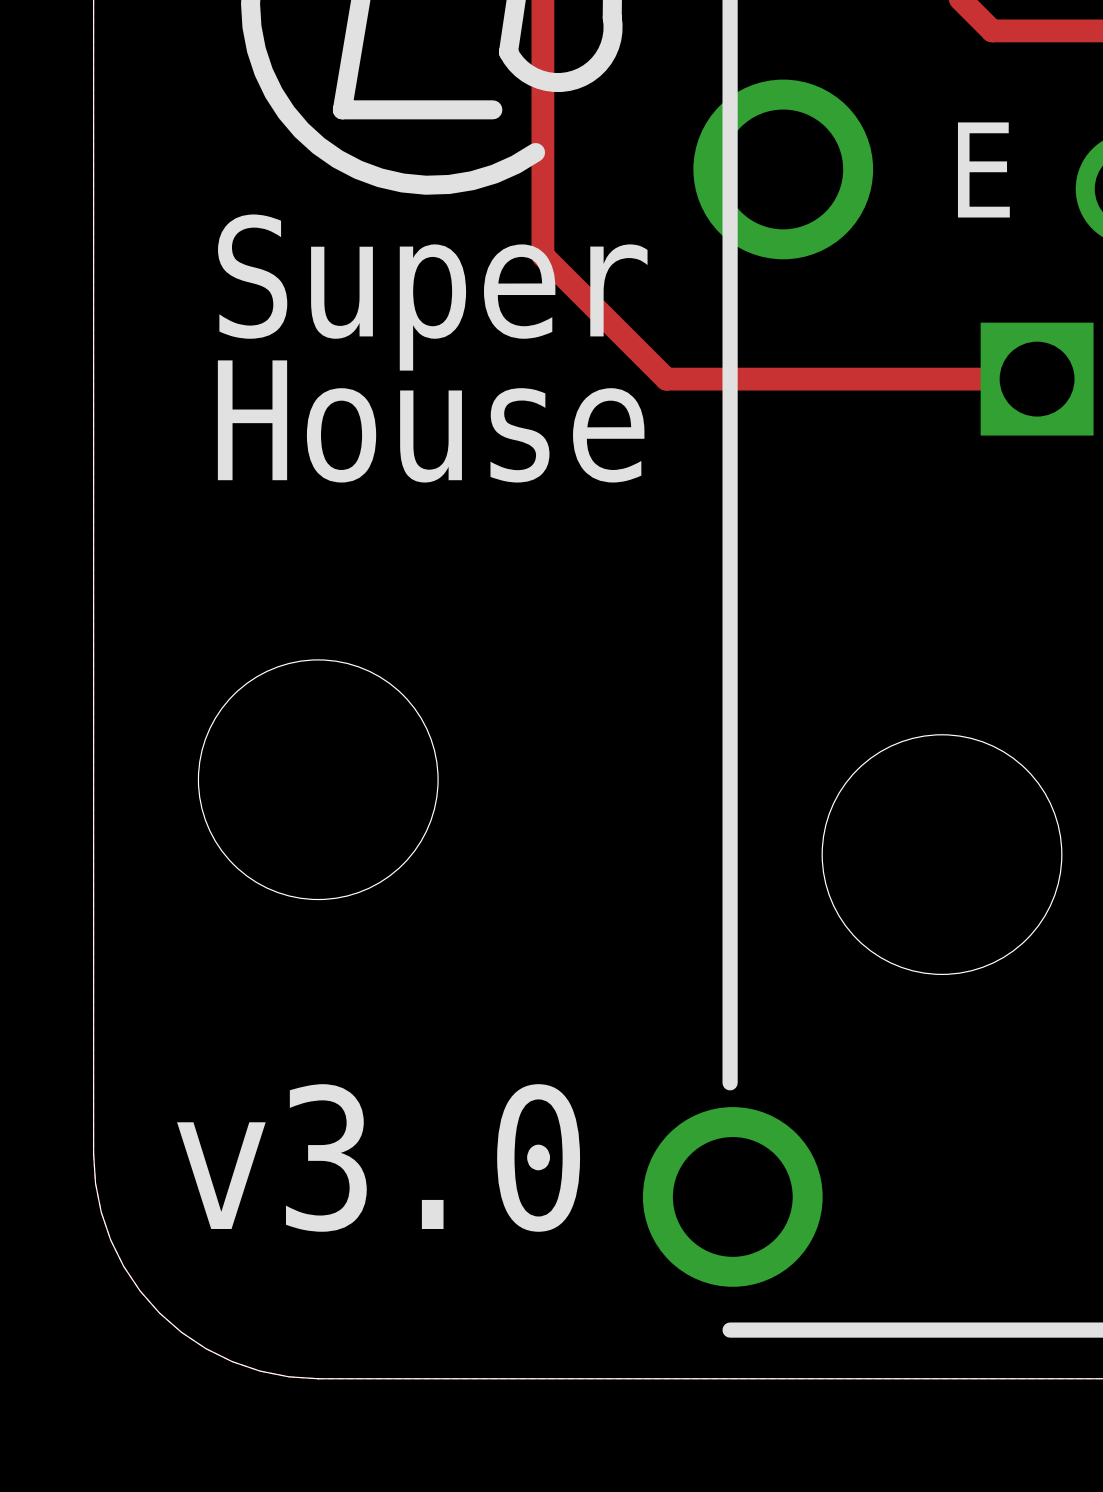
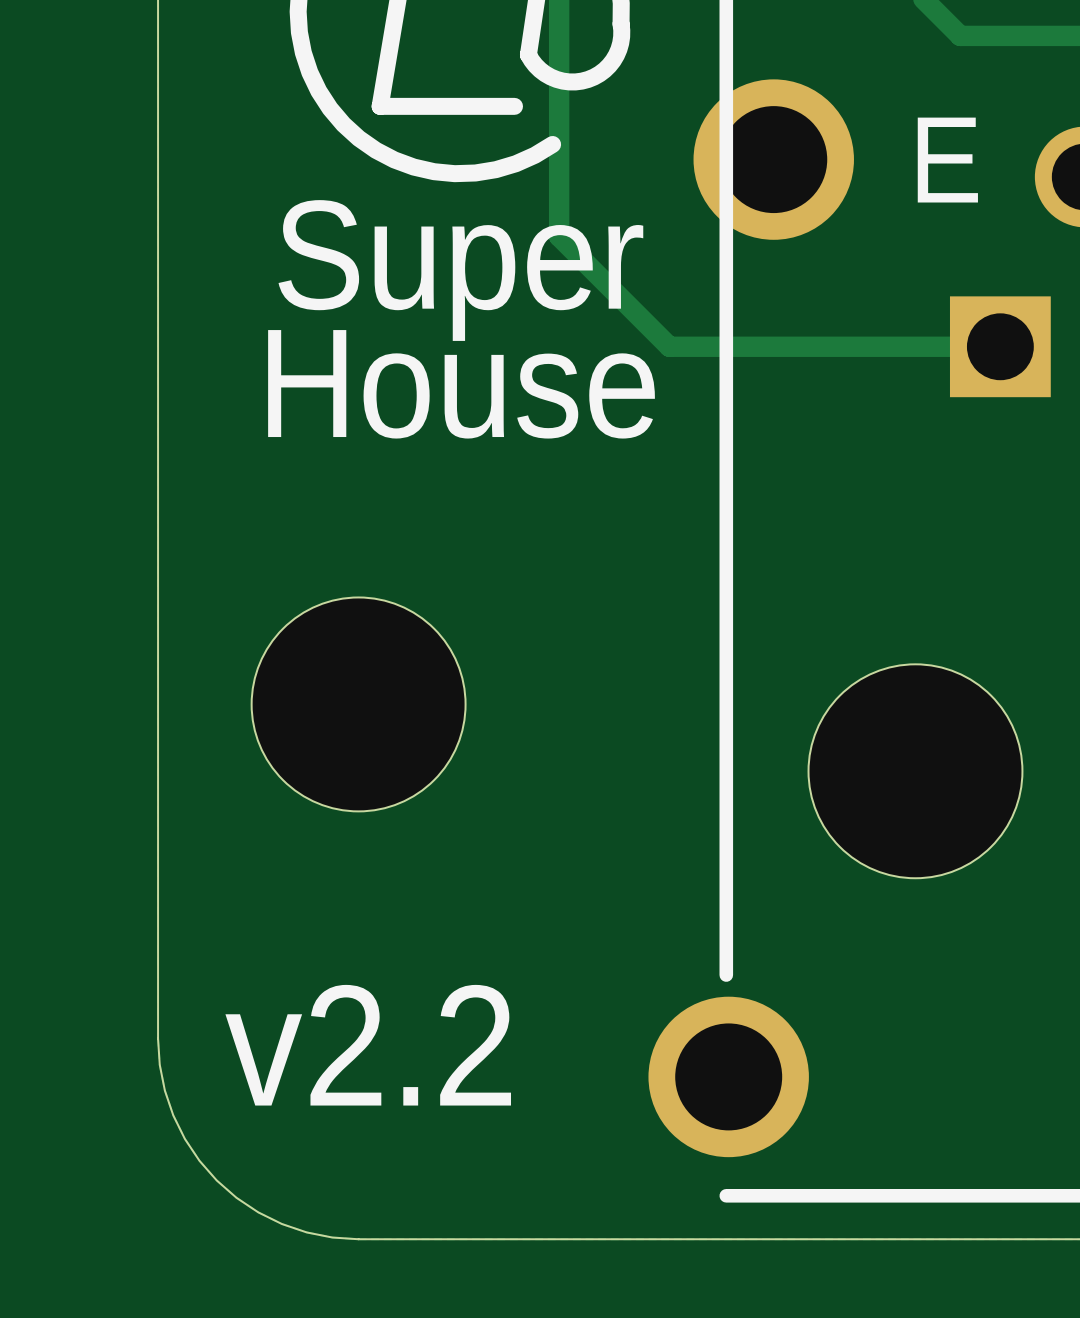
text: v3.0 (378, 1157) -> v2.2 (368, 1045)

